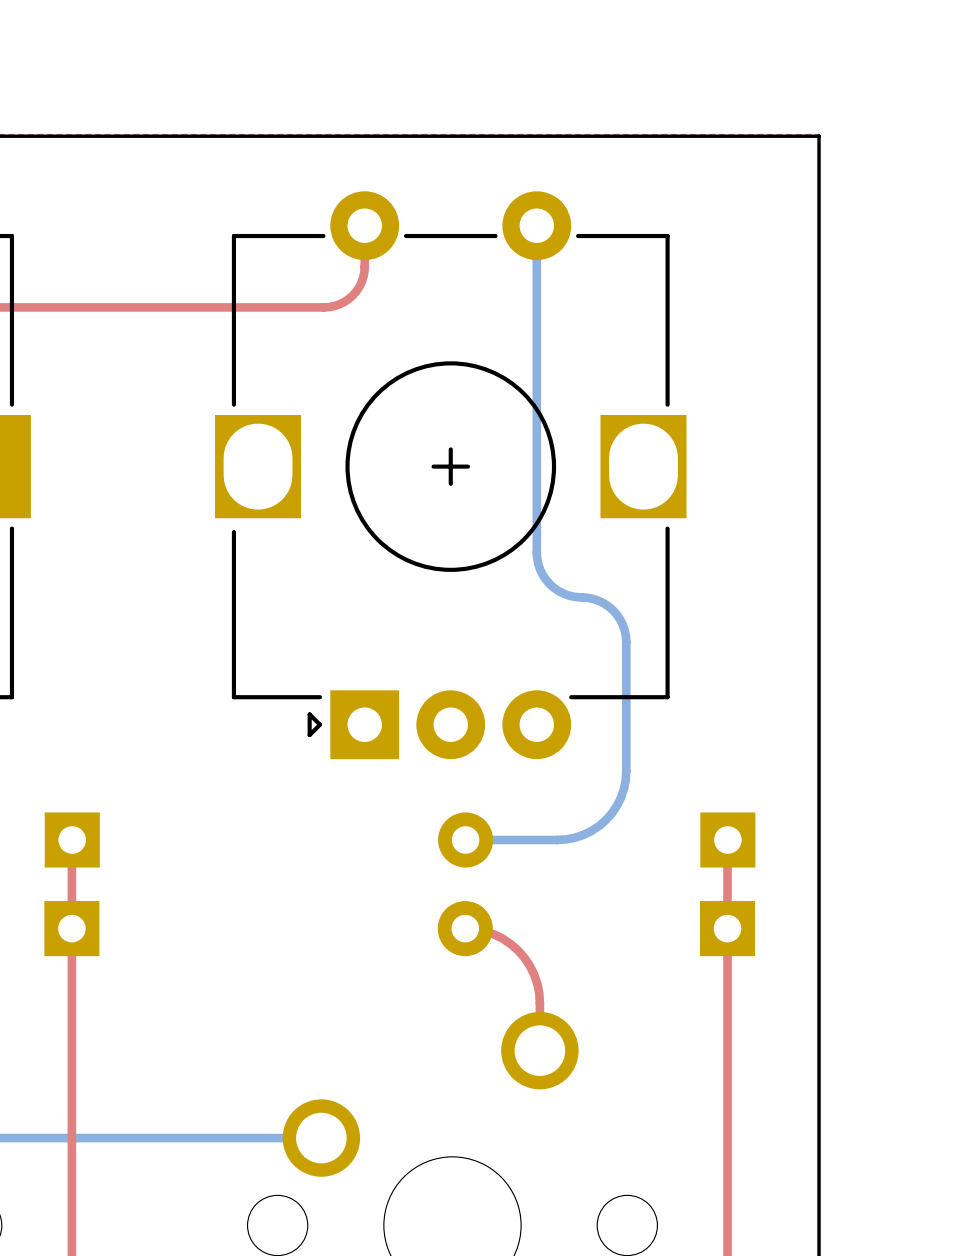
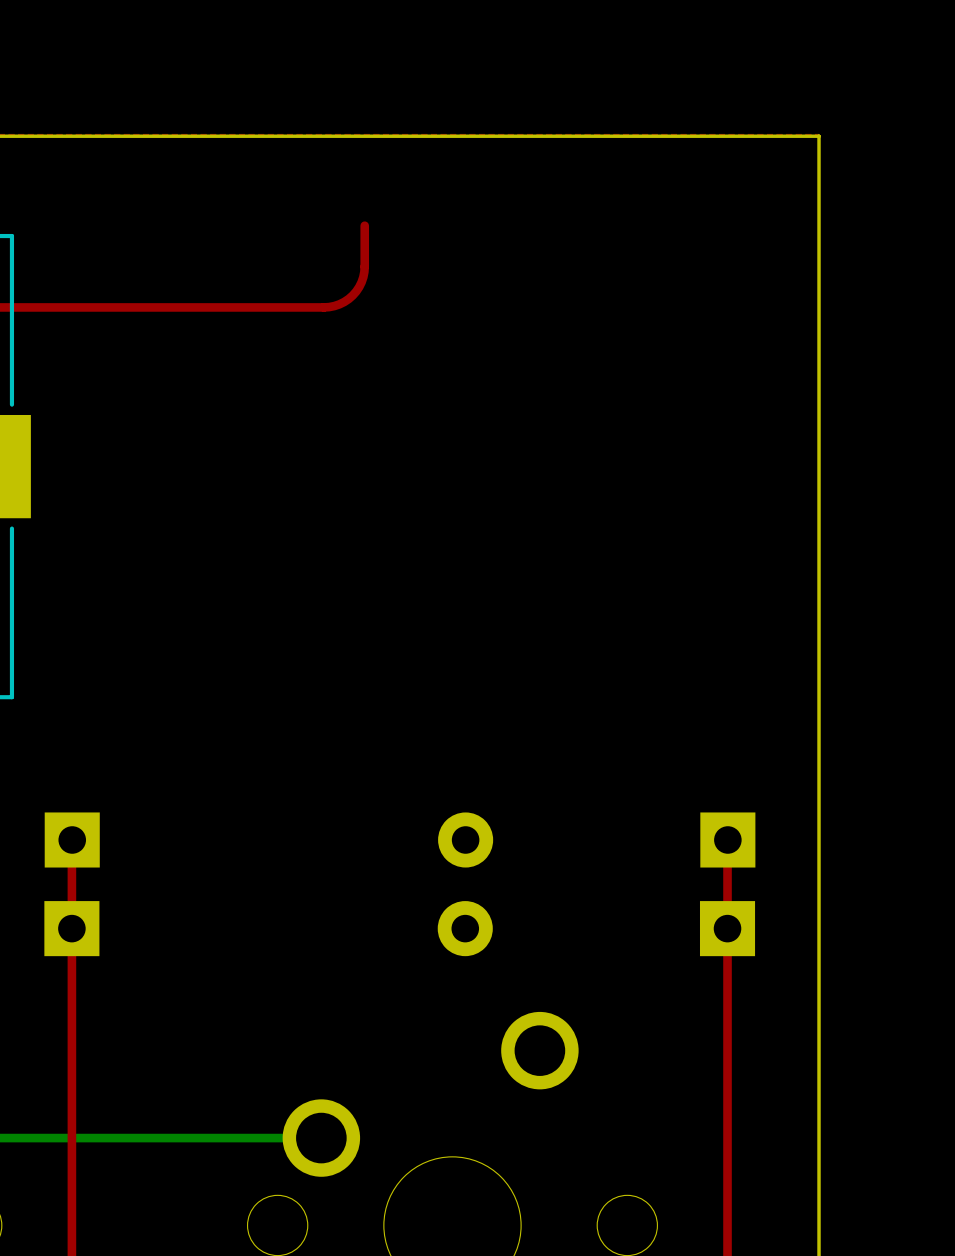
bottom track: (536, 225) (537, 558) (542, 575) (554, 588) (569, 595) (593, 598) (603, 603) (613, 610) (622, 625) (626, 642) (625, 780) (621, 797) (612, 813) (599, 825) (583, 834) (557, 839) (465, 839) -> none
part: (450, 475) -> none
top track: (465, 928) (484, 931) (502, 938) (518, 950) (529, 965) (539, 993) (539, 1050) -> none

